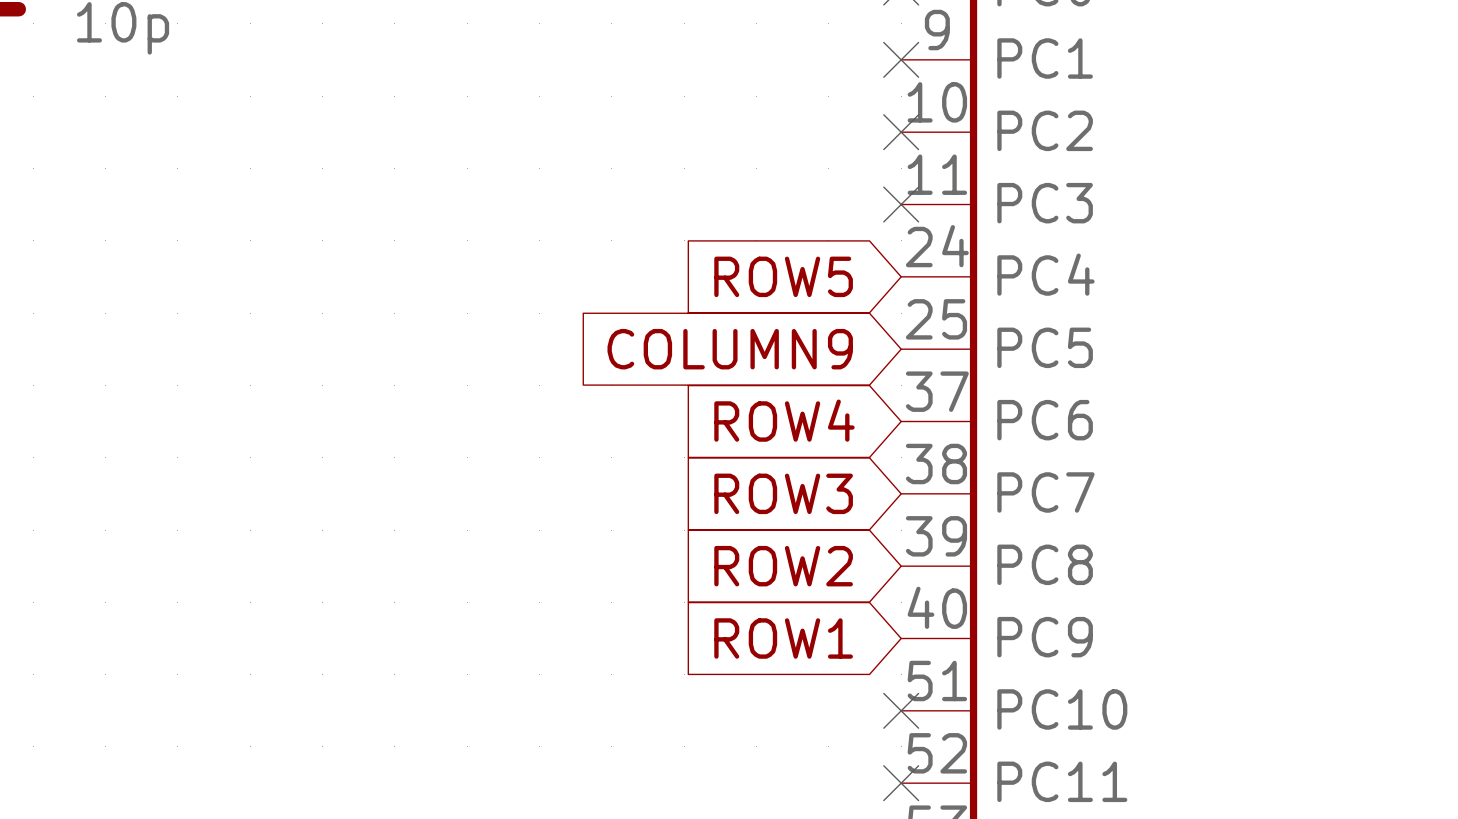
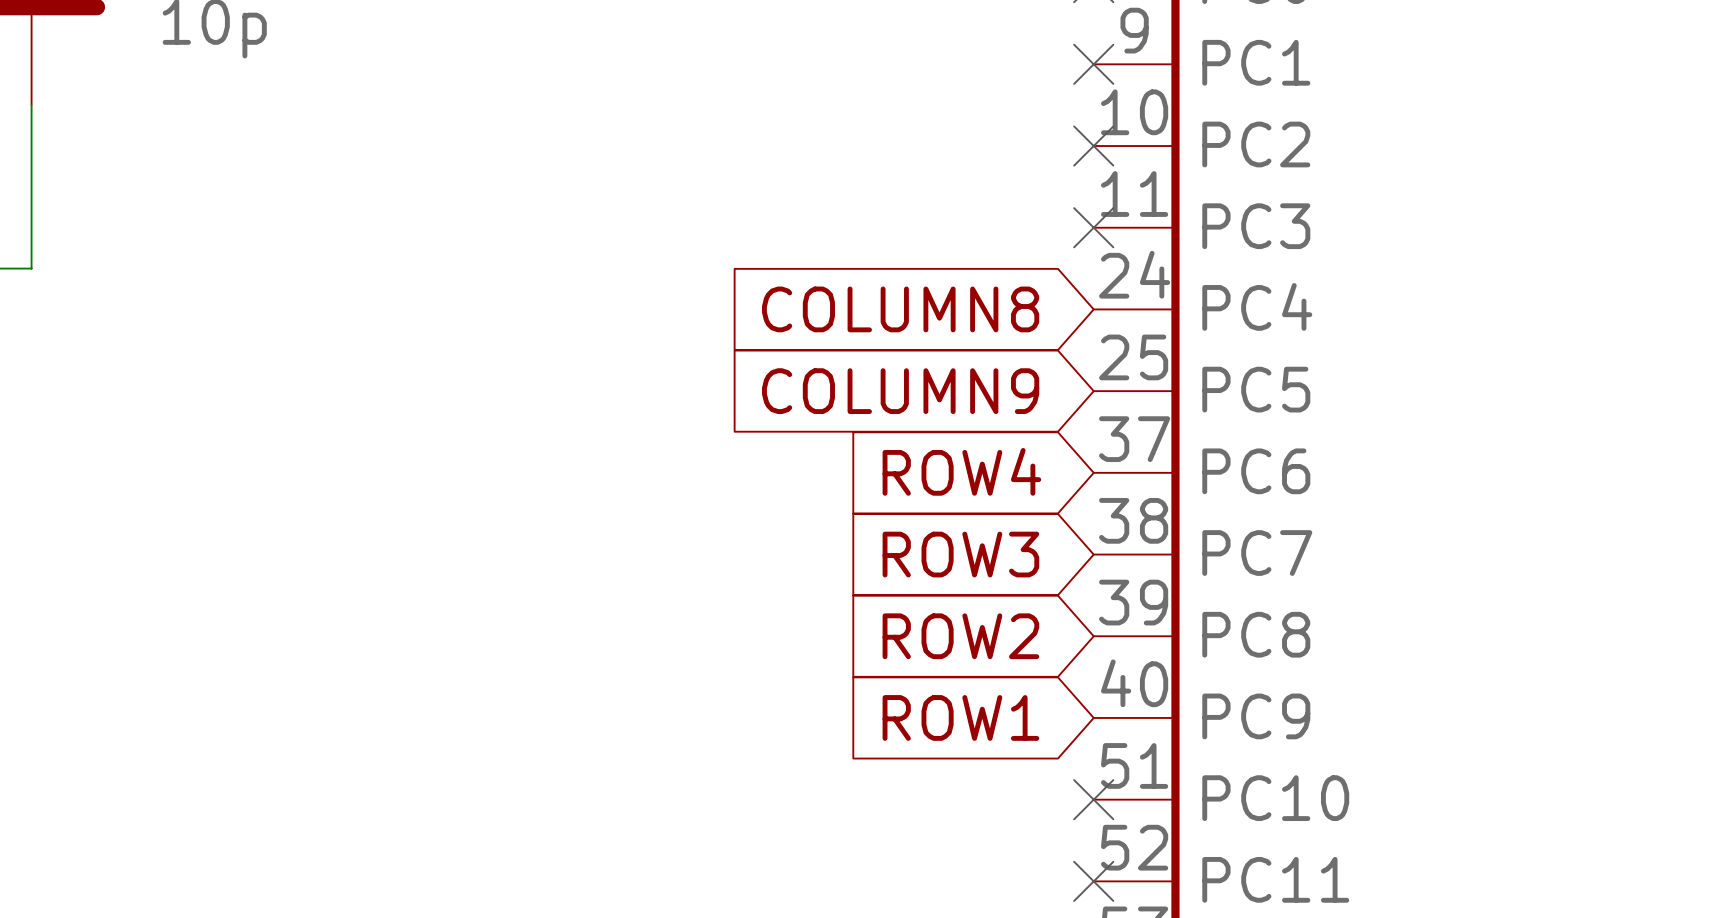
global label: ROW5 (783, 276) -> COLUMN8 (900, 309)

